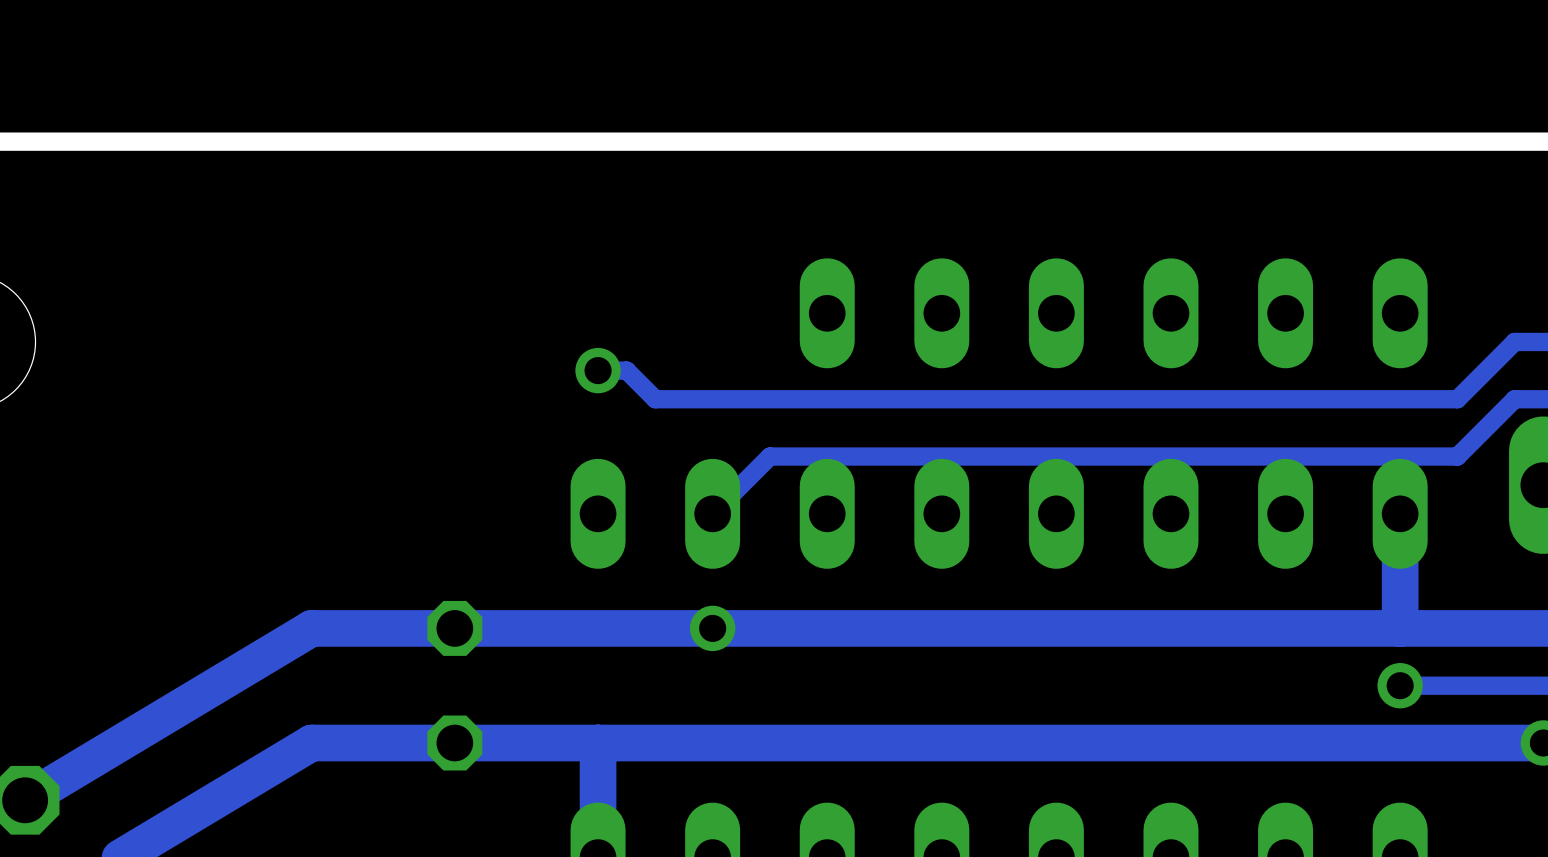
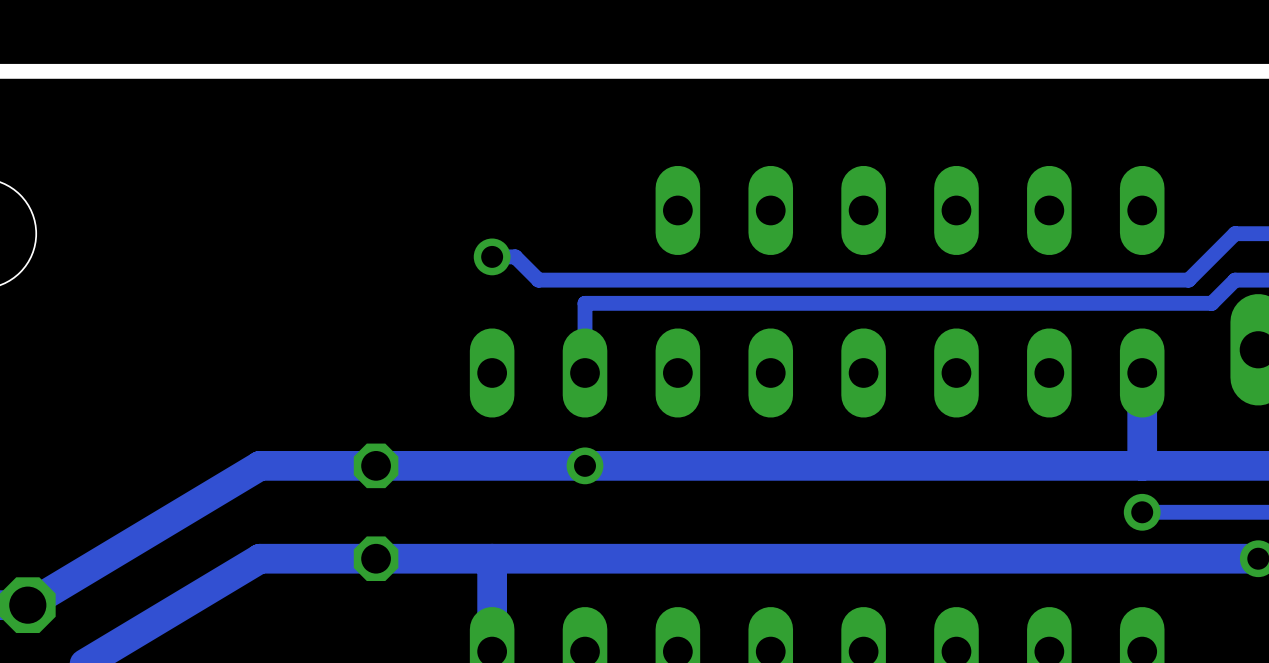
track: (1486, 427) (1457, 456) (769, 456) (712, 513) -> (1211, 303) (585, 303) (585, 372)

